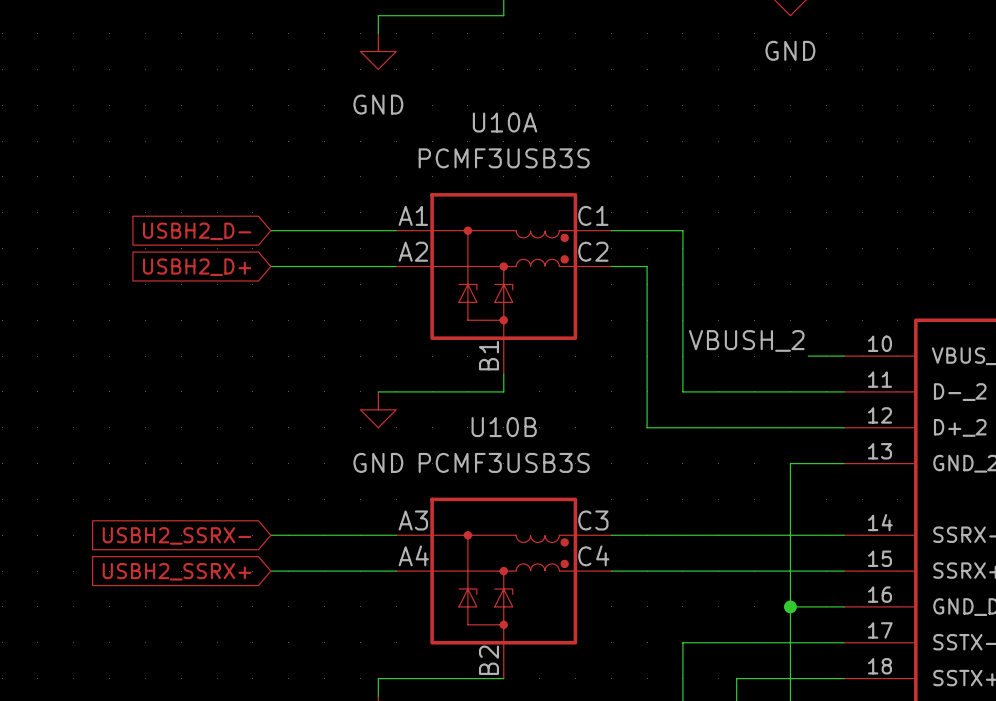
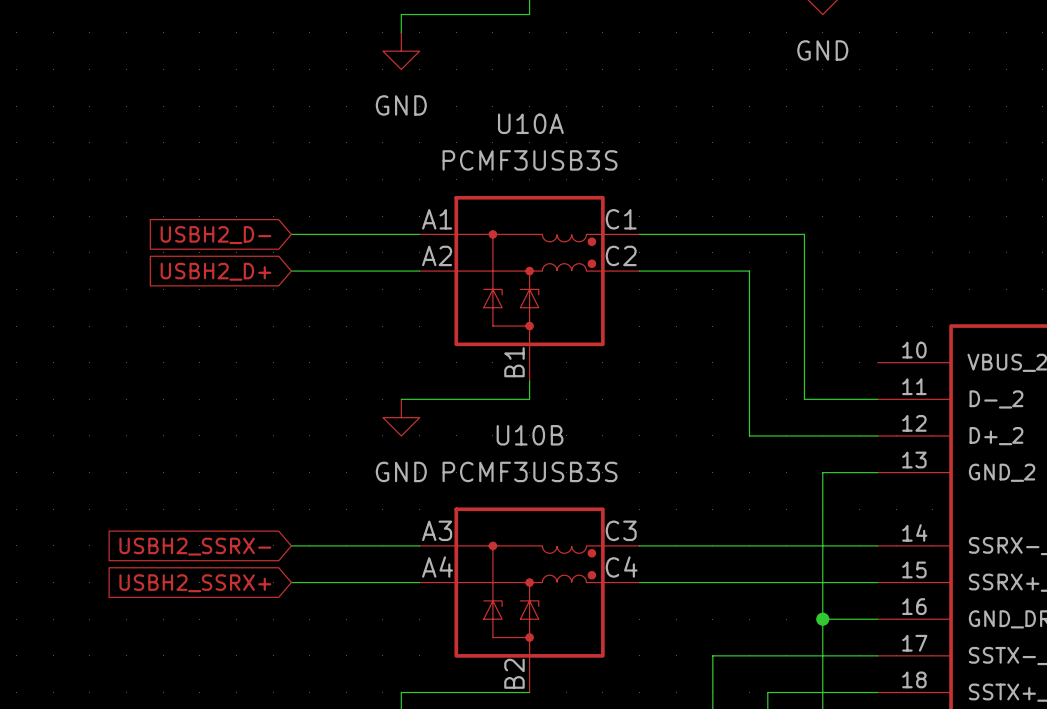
wire: (682, 230) (682, 391) (772, 391) -> (712, 234) (804, 234) (804, 399)
wire: (647, 266) (647, 427) (718, 427) -> (676, 271) (749, 271) (749, 435)
label: VBUSH_2 (746, 340) -> none
wire: (808, 356) (844, 356) -> none

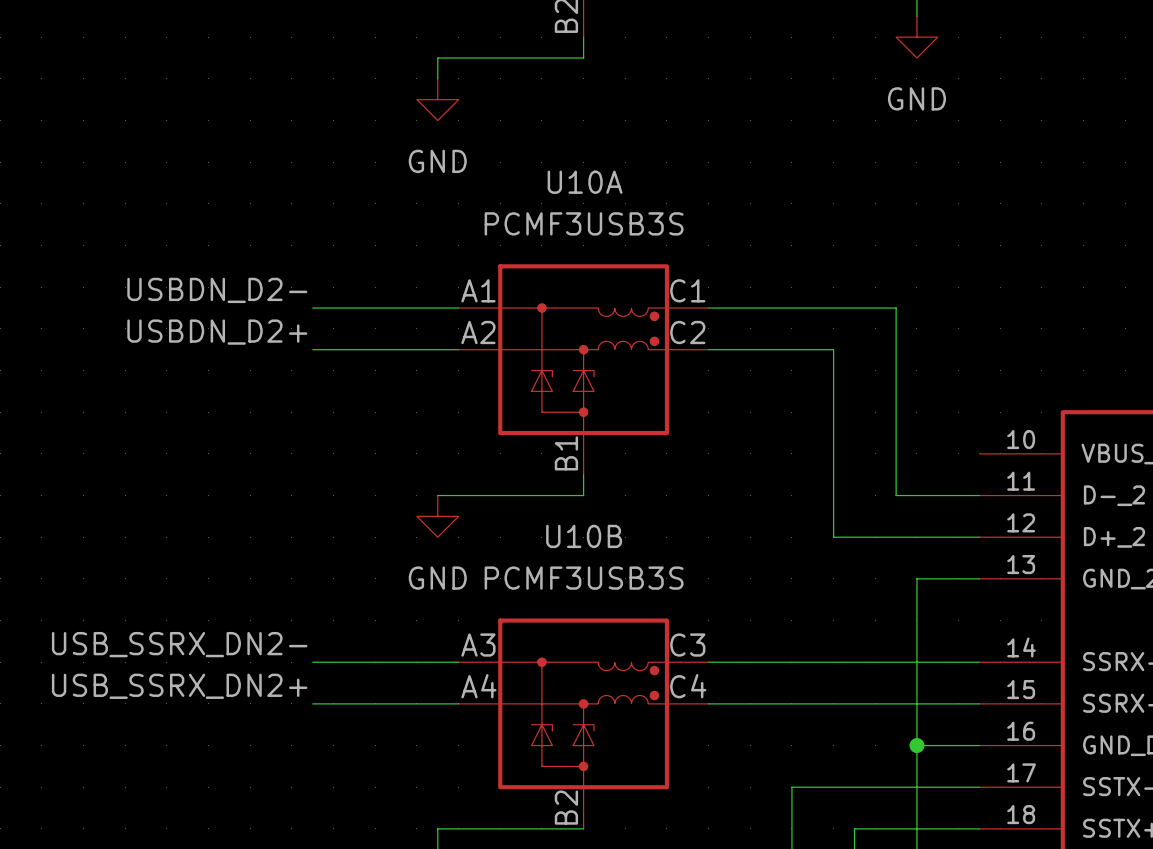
label: none -> USBDN_D2- (217, 290)
global label: USBH2_D- (215, 235) -> none
label: none -> USBDN_D2+ (217, 332)
global label: USBH2_D+ (215, 271) -> none
label: none -> USB_SSRX_DN2- (179, 644)
global label: USBH2_SSRX- (195, 546) -> none
label: none -> USB_SSRX_DN2+ (179, 686)
global label: USBH2_SSRX+ (195, 583) -> none

